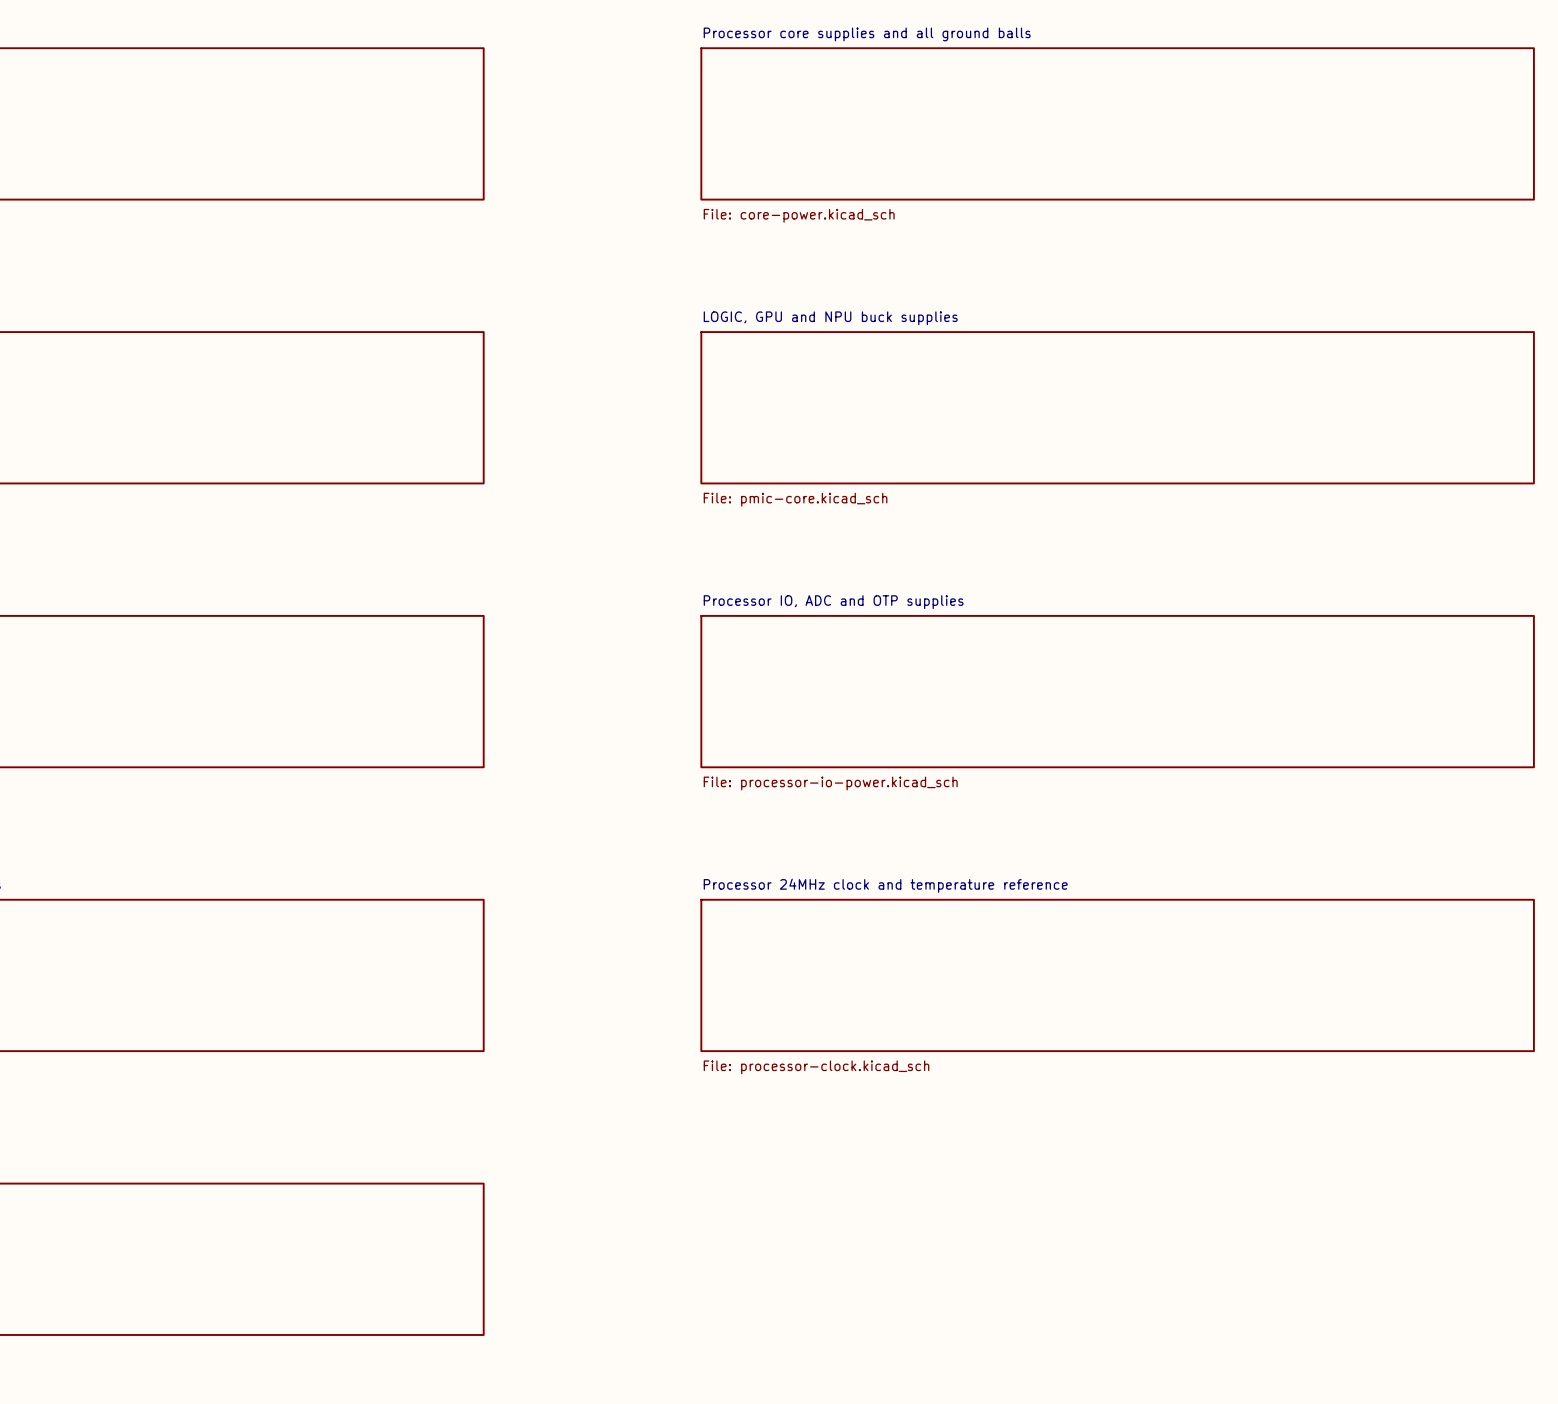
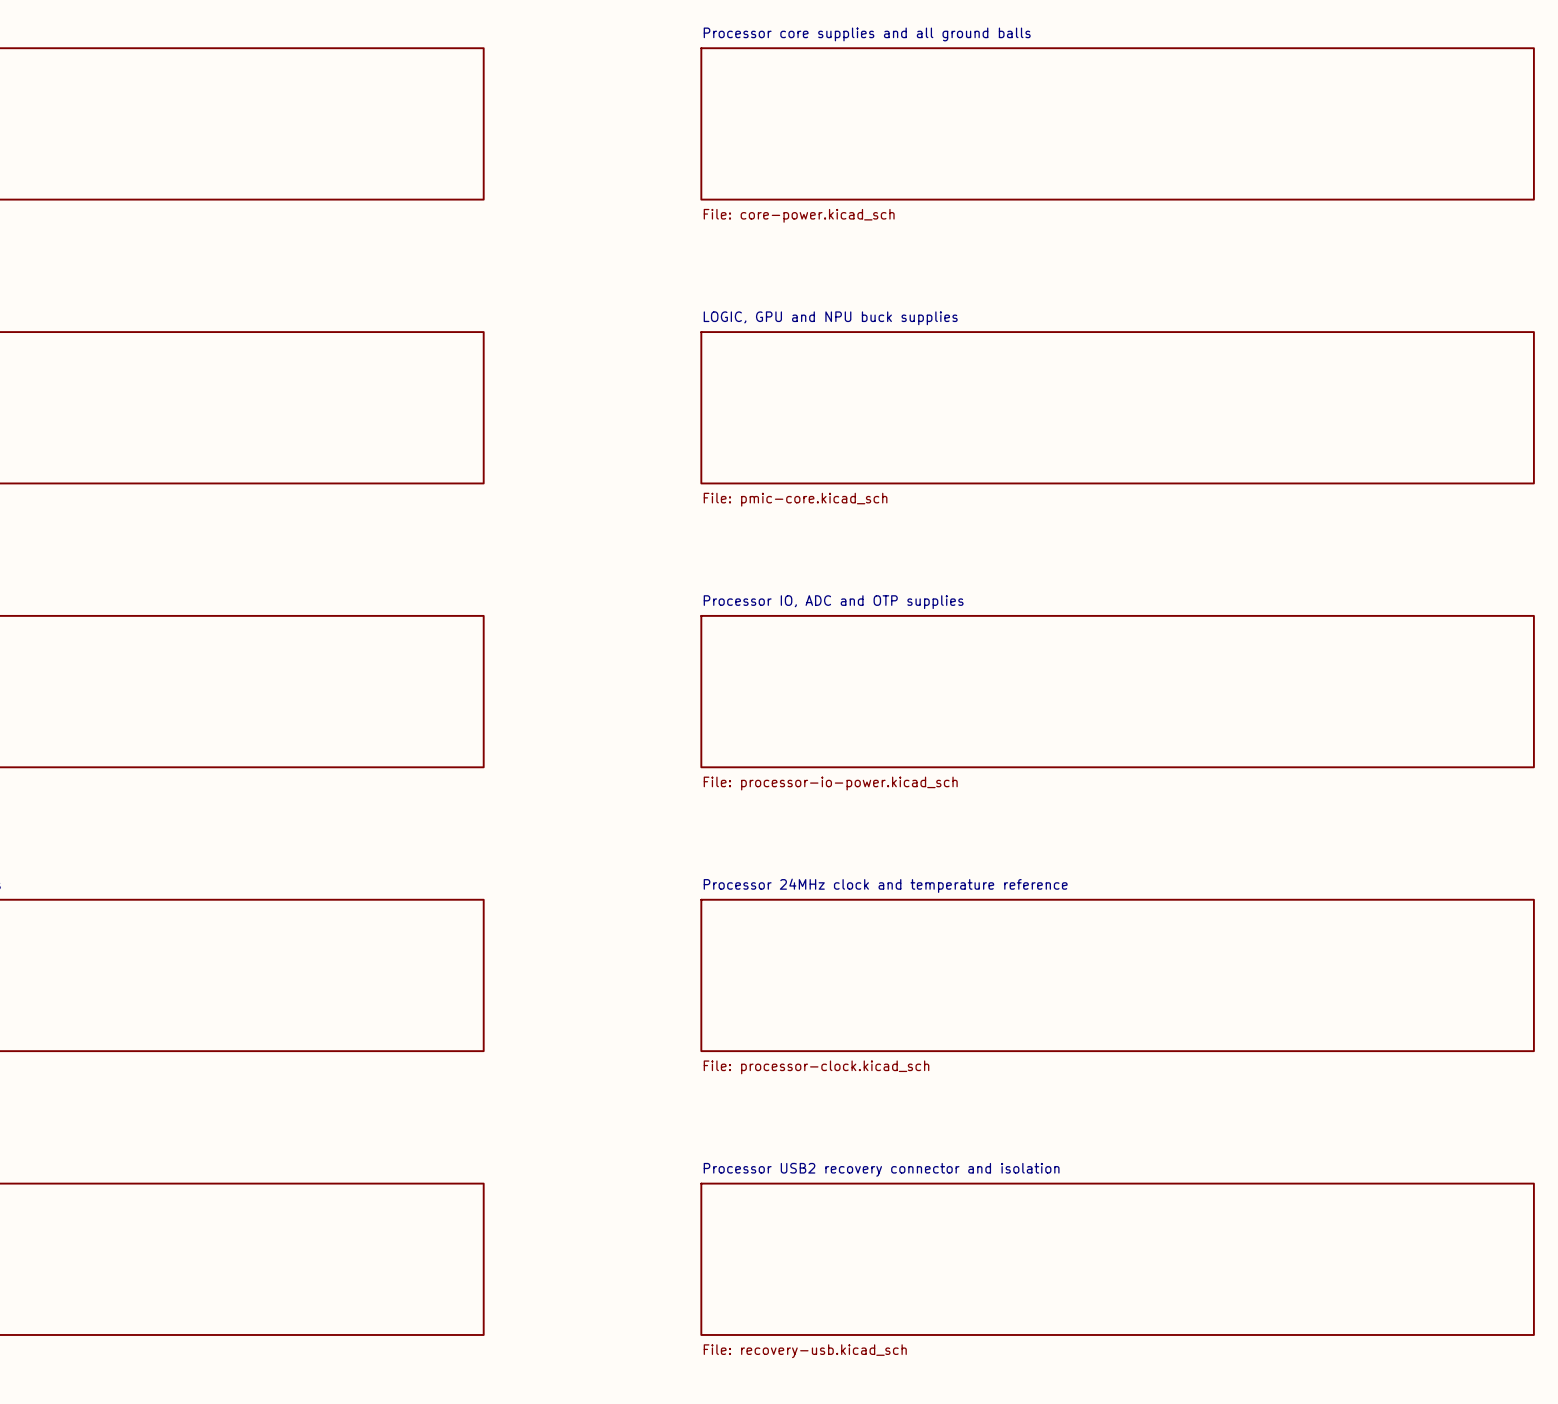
sheet Processor USB2 recovery connector and isolation: none -> File: recovery-usb.kicad_sch (1117, 1259)

